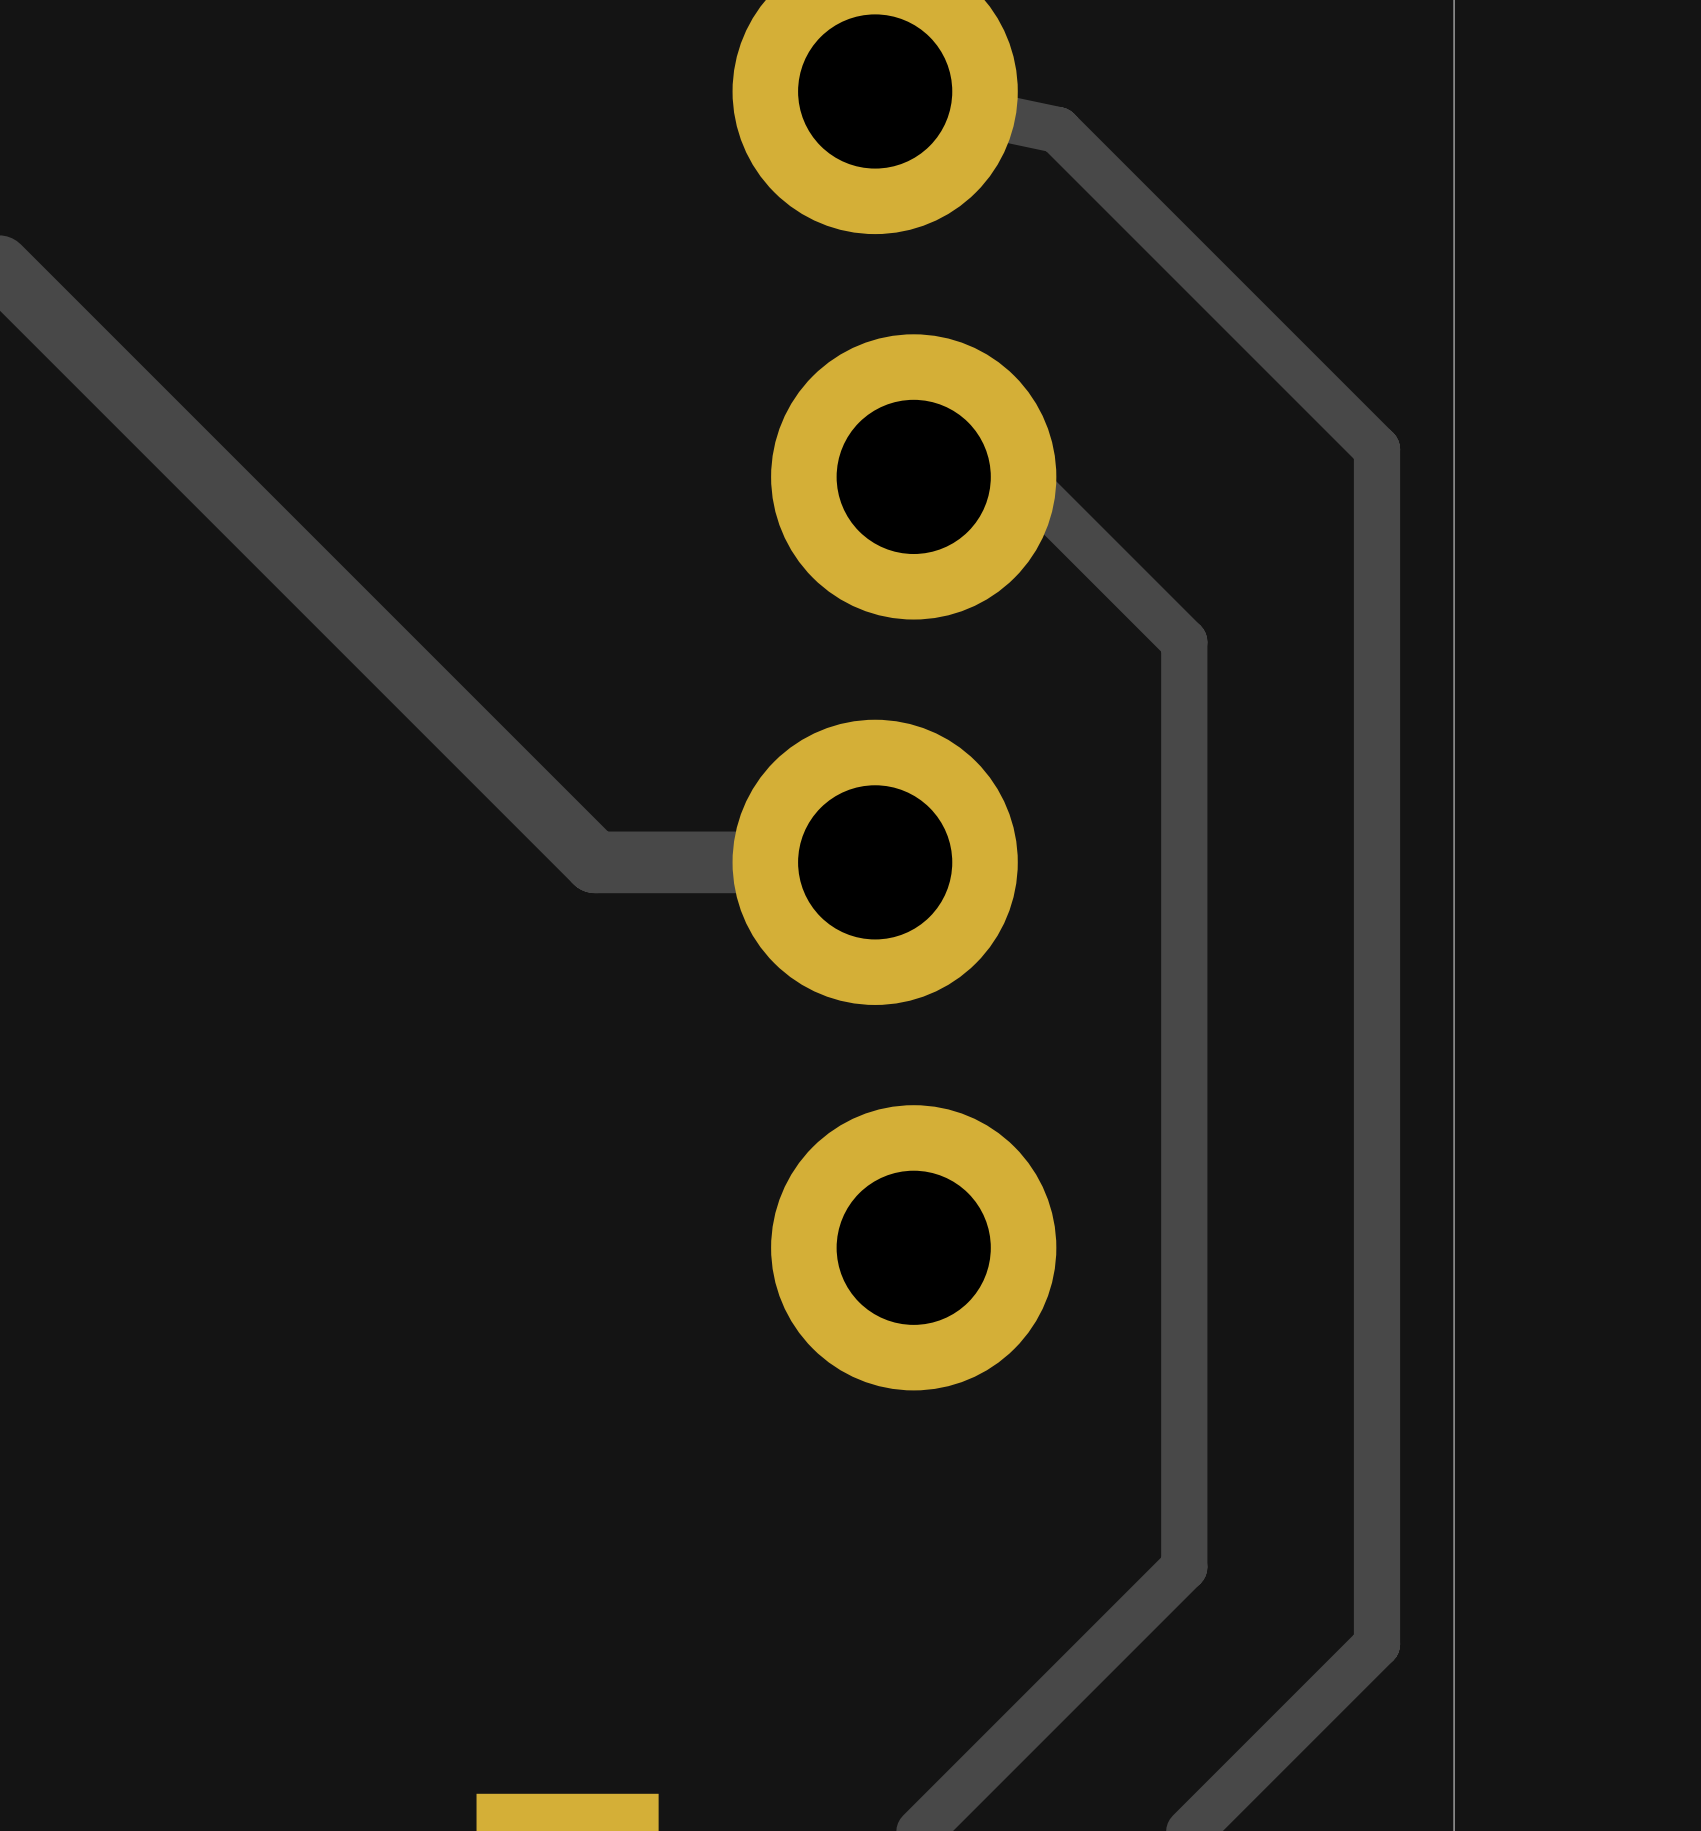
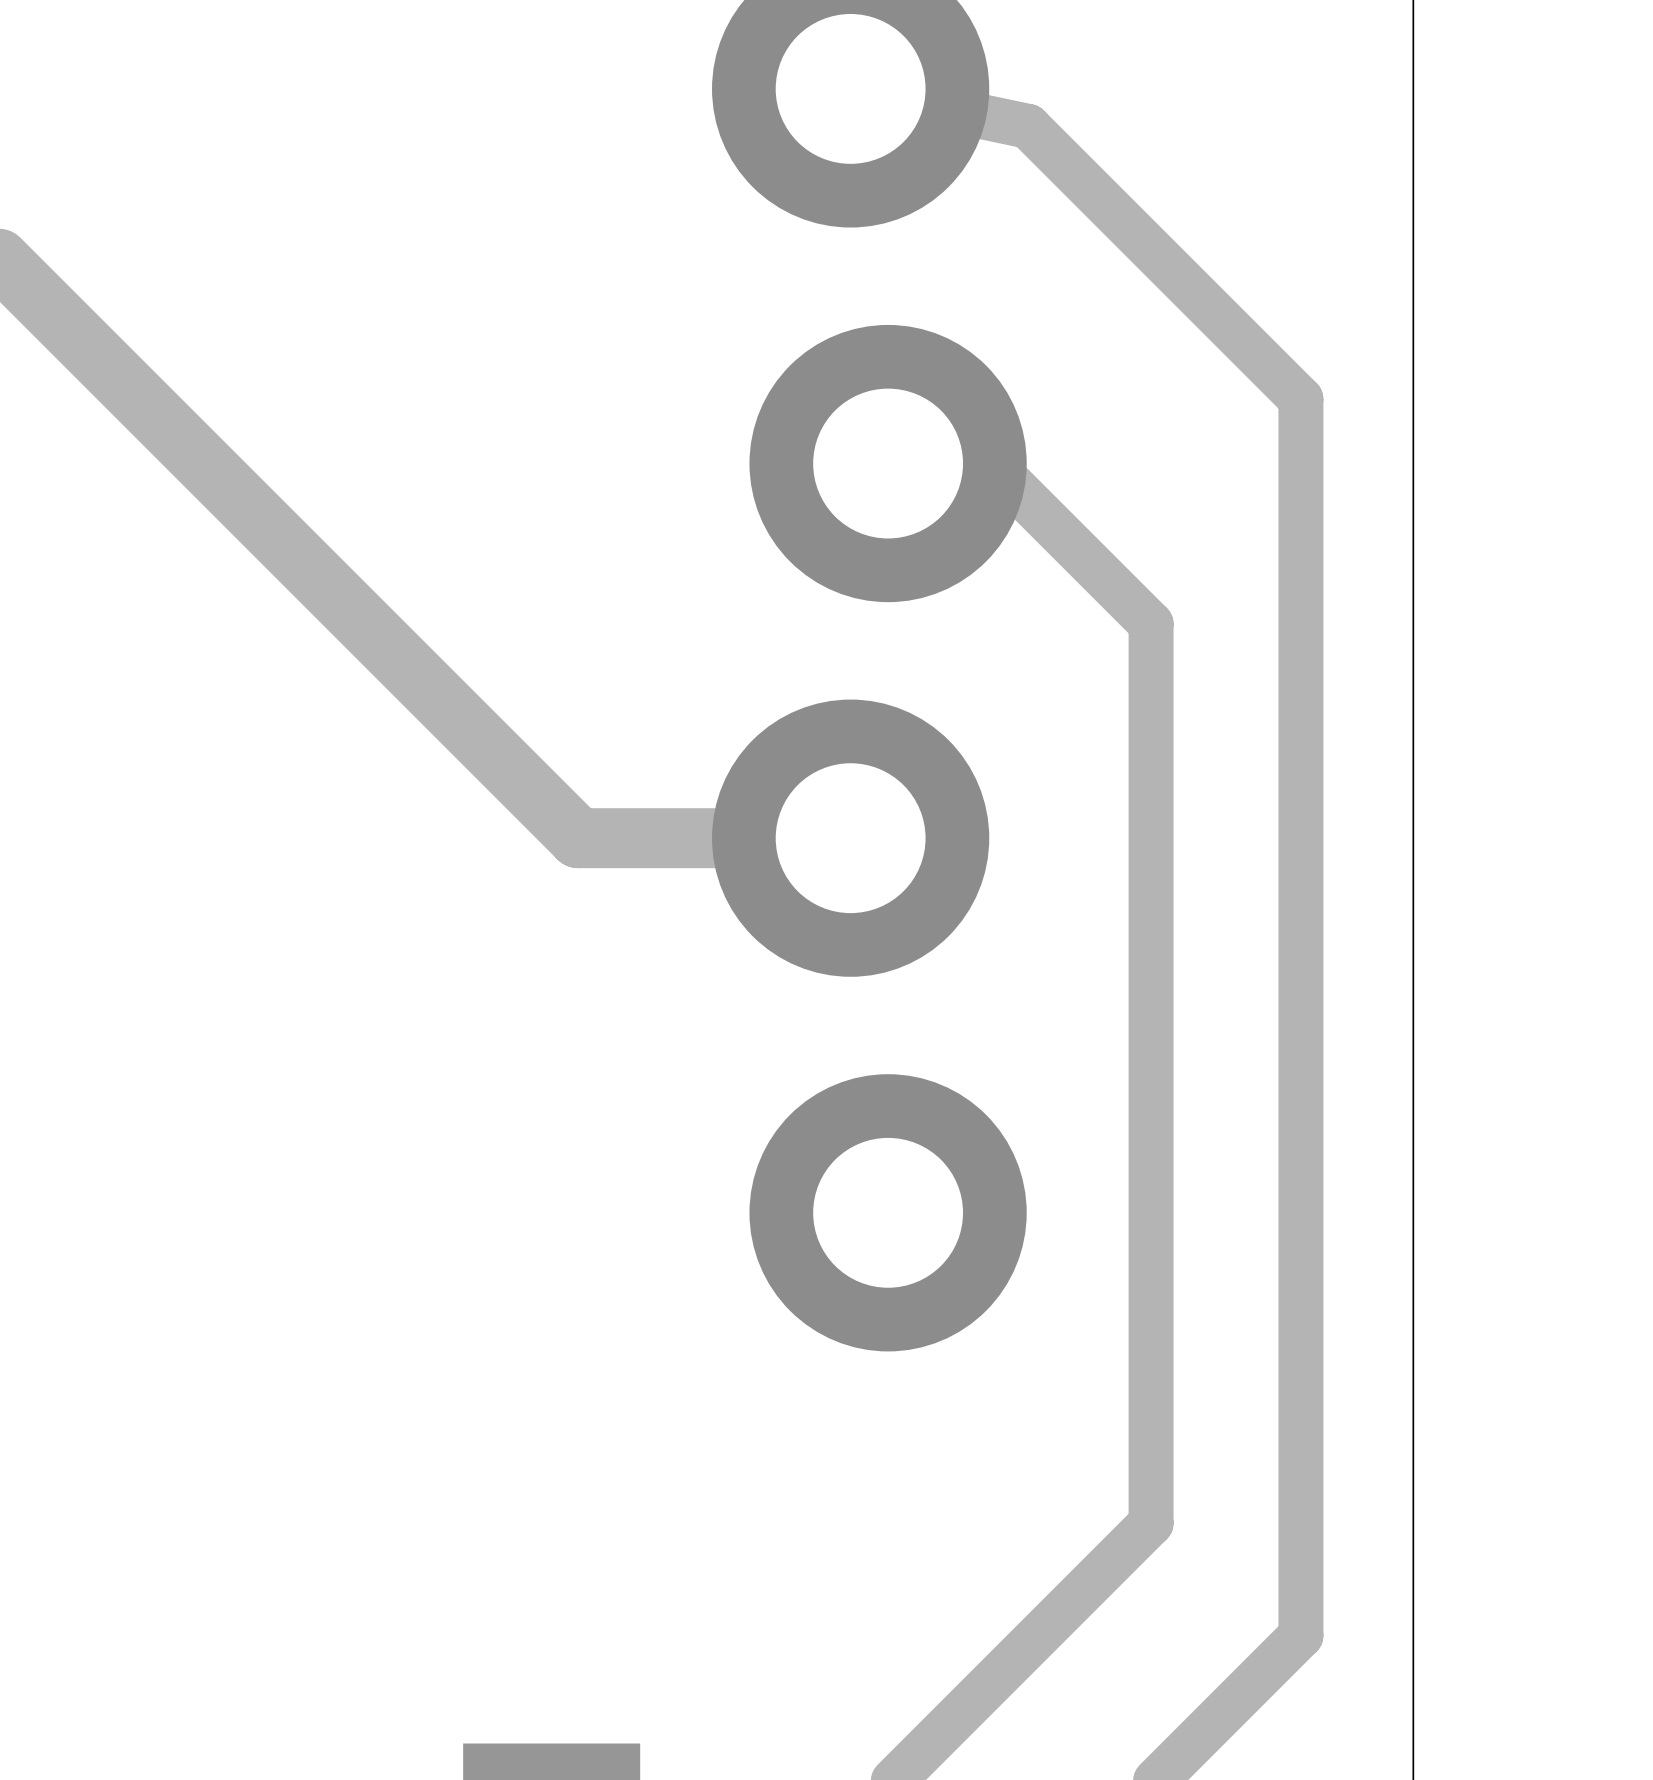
track: (1338, 410) (1377, 449) (1377, 1644) (1338, 1682) -> (1300, 399) (1300, 1635)

